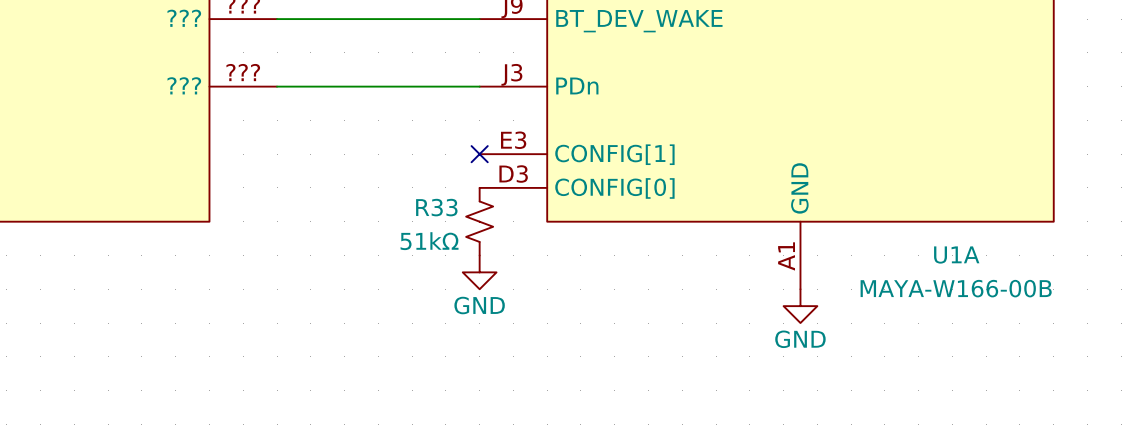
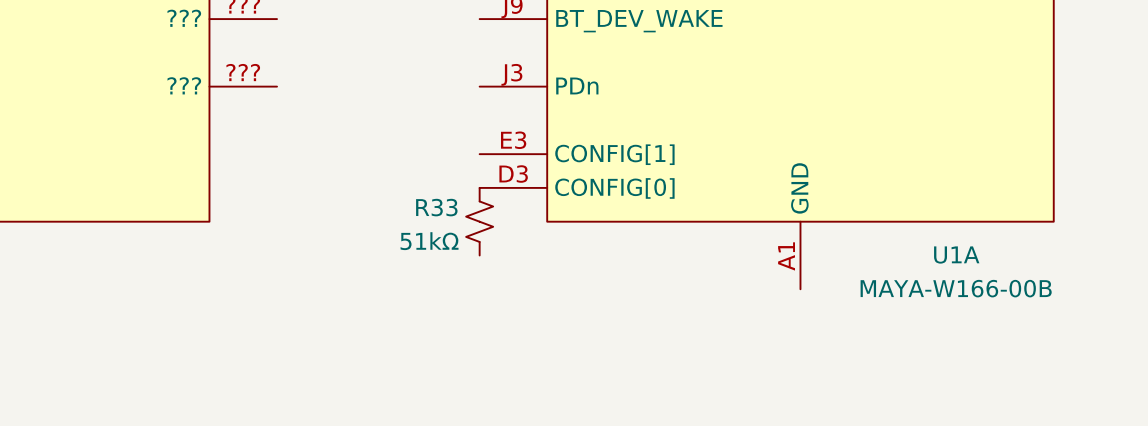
wire: (277, 19) (479, 19) -> none
wire: (277, 86) (479, 86) -> none
no-connect mark: (479, 154) -> none
power symbol: GND (479, 272) -> none
power symbol: GND (800, 306) -> none

